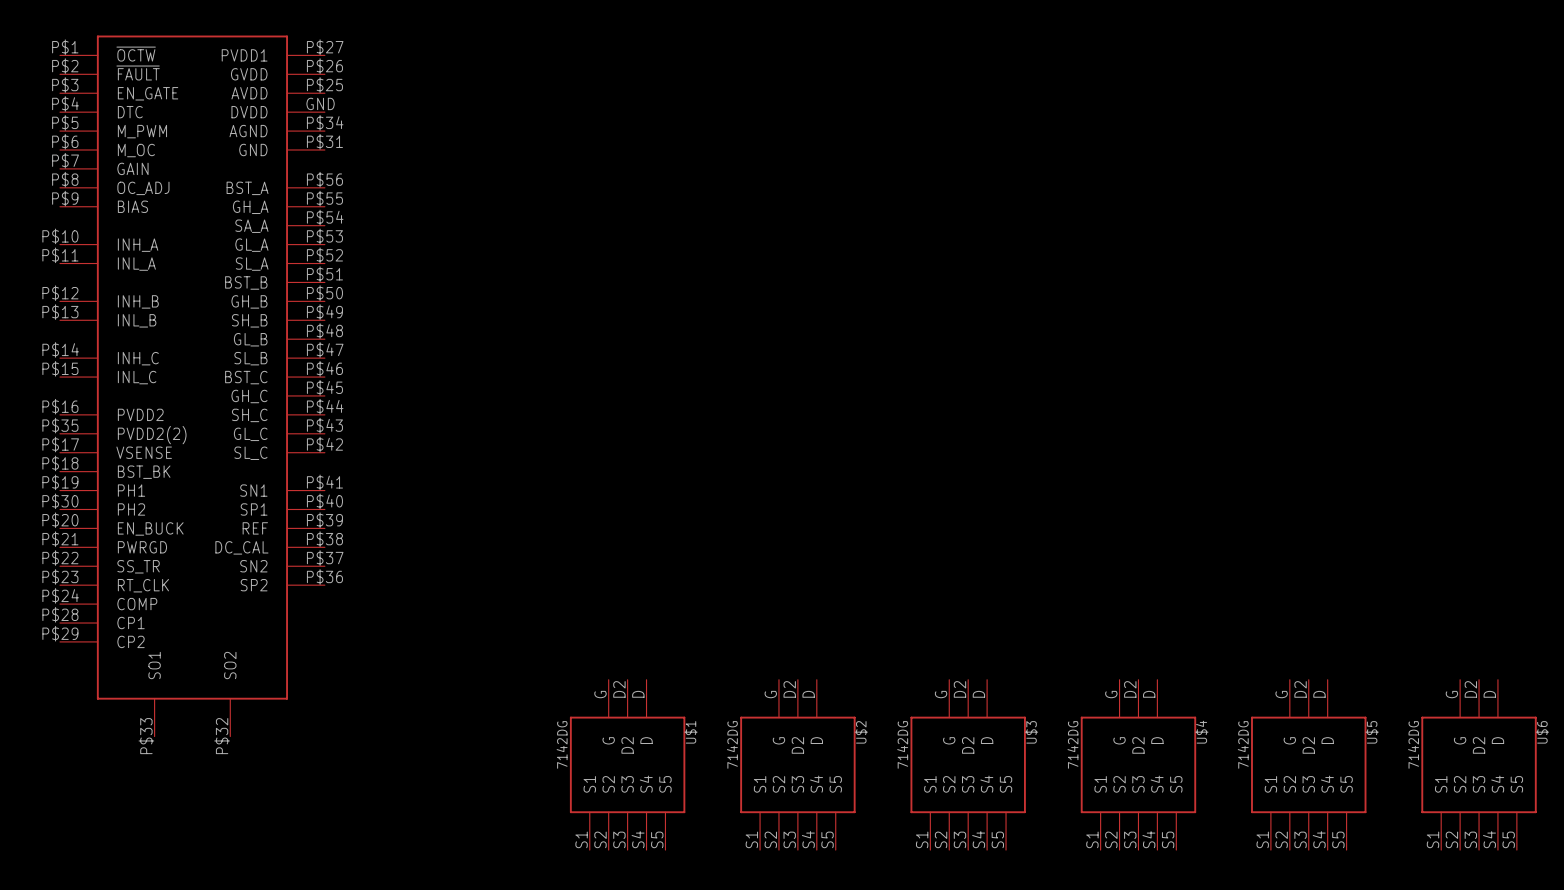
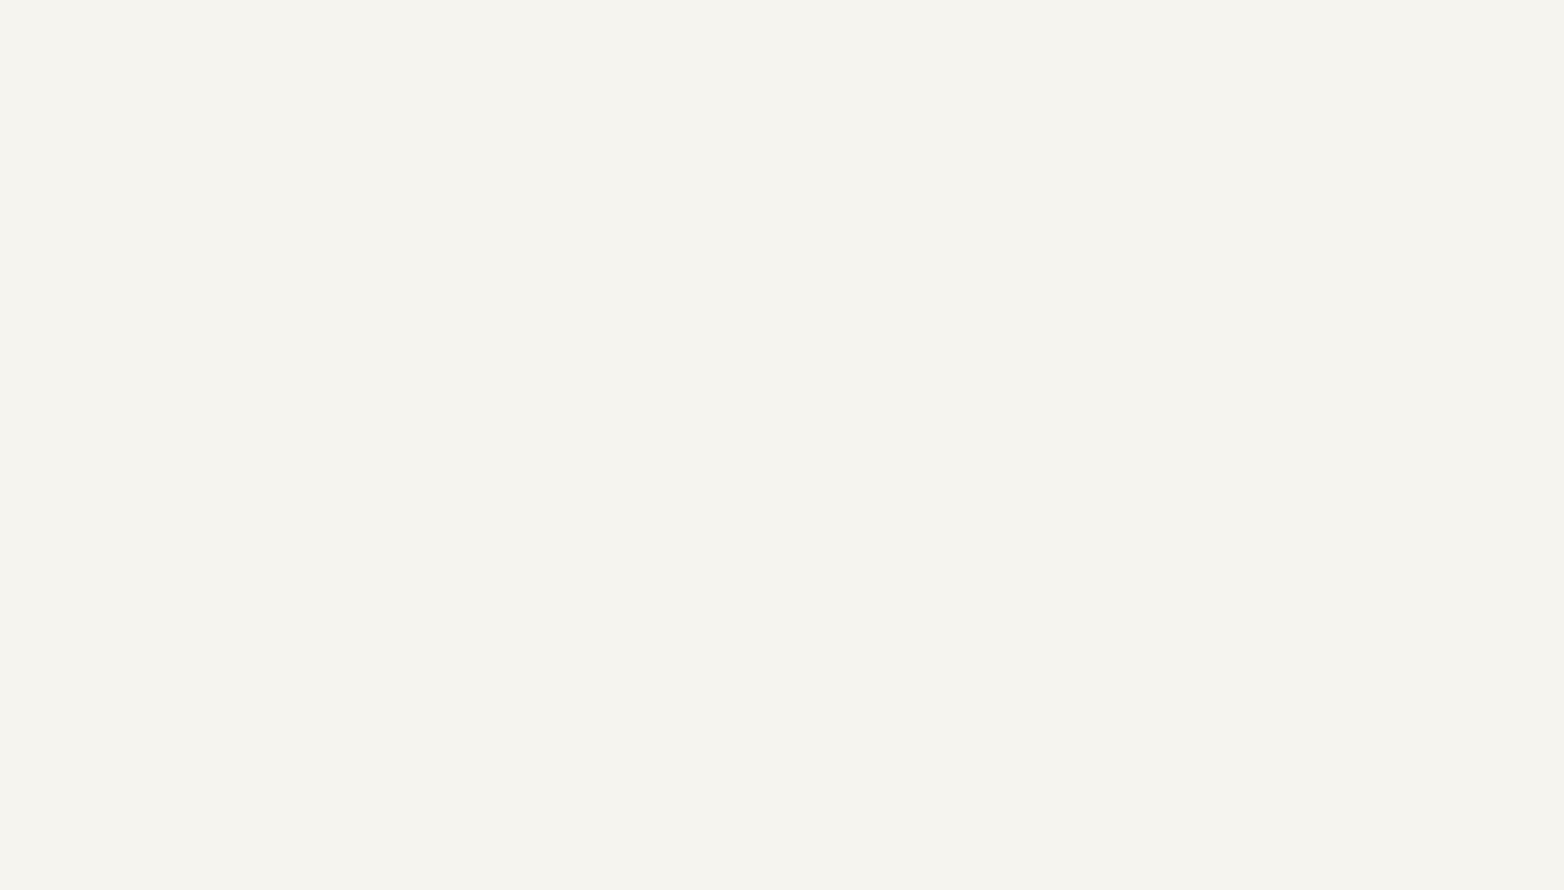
part: (192, 386) -> none
U$1: 7142DG (627, 764) -> none
U$2: 7142DG (797, 764) -> none
U$3: 7142DG (968, 764) -> none
U$4: 7142DG (1138, 764) -> none
U$5: 7142DG (1308, 764) -> none
U$6: 7142DG (1479, 764) -> none

